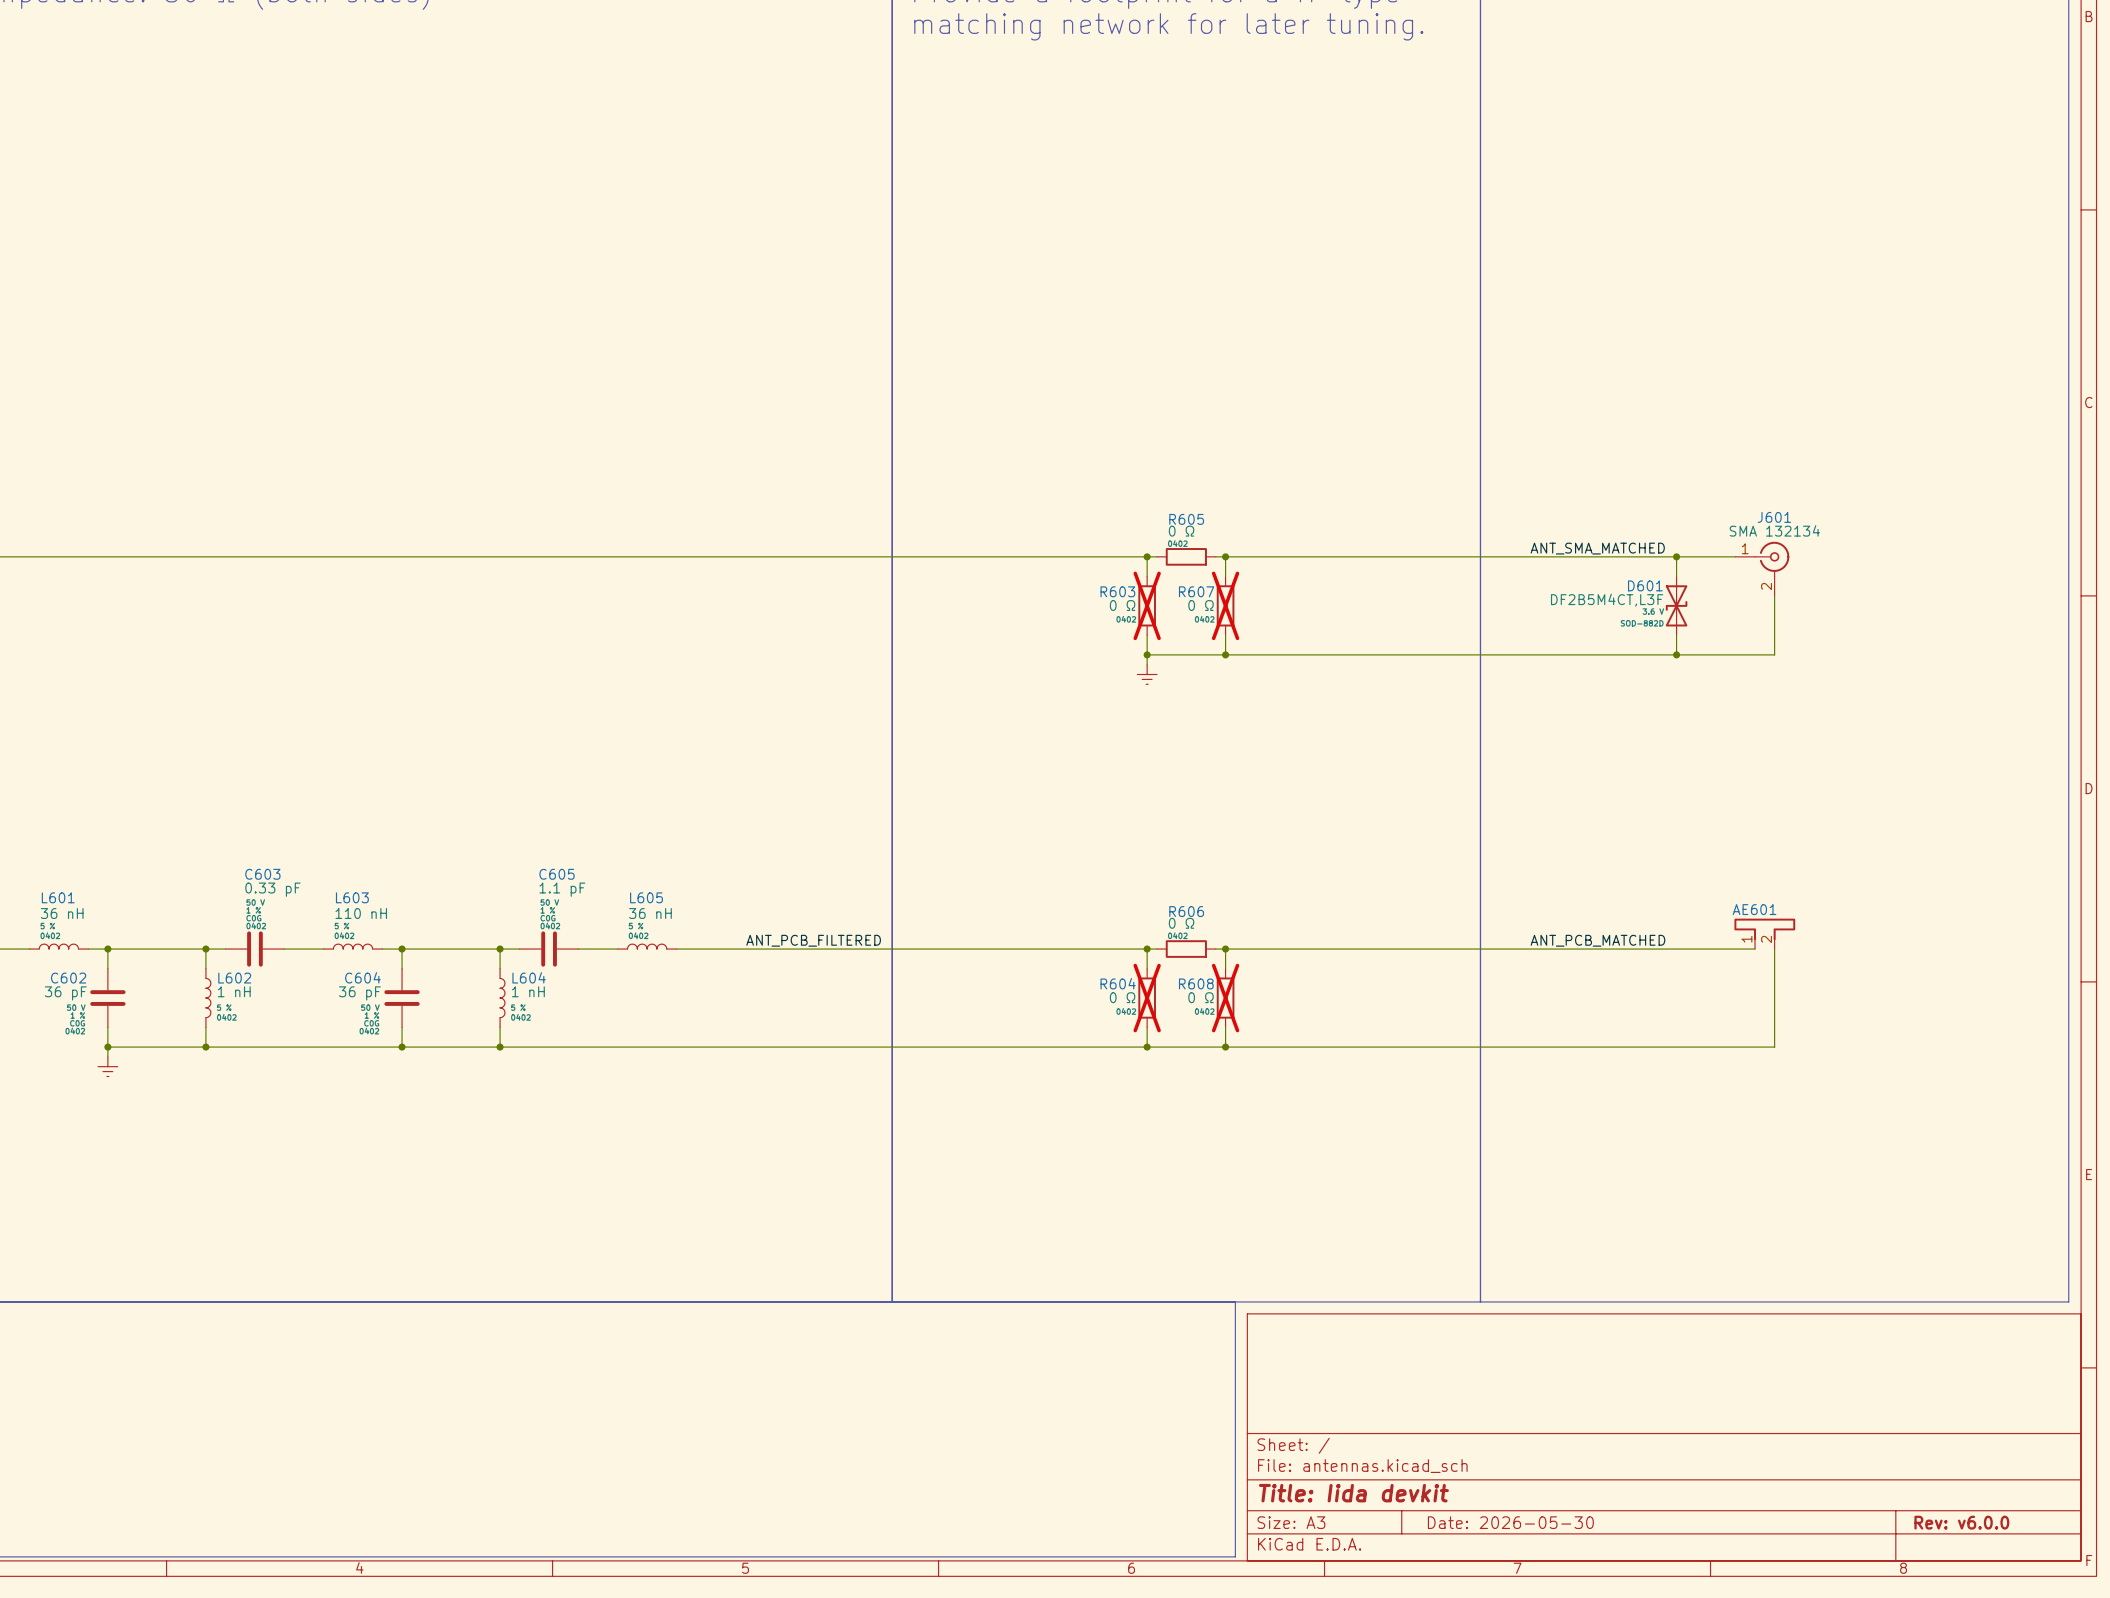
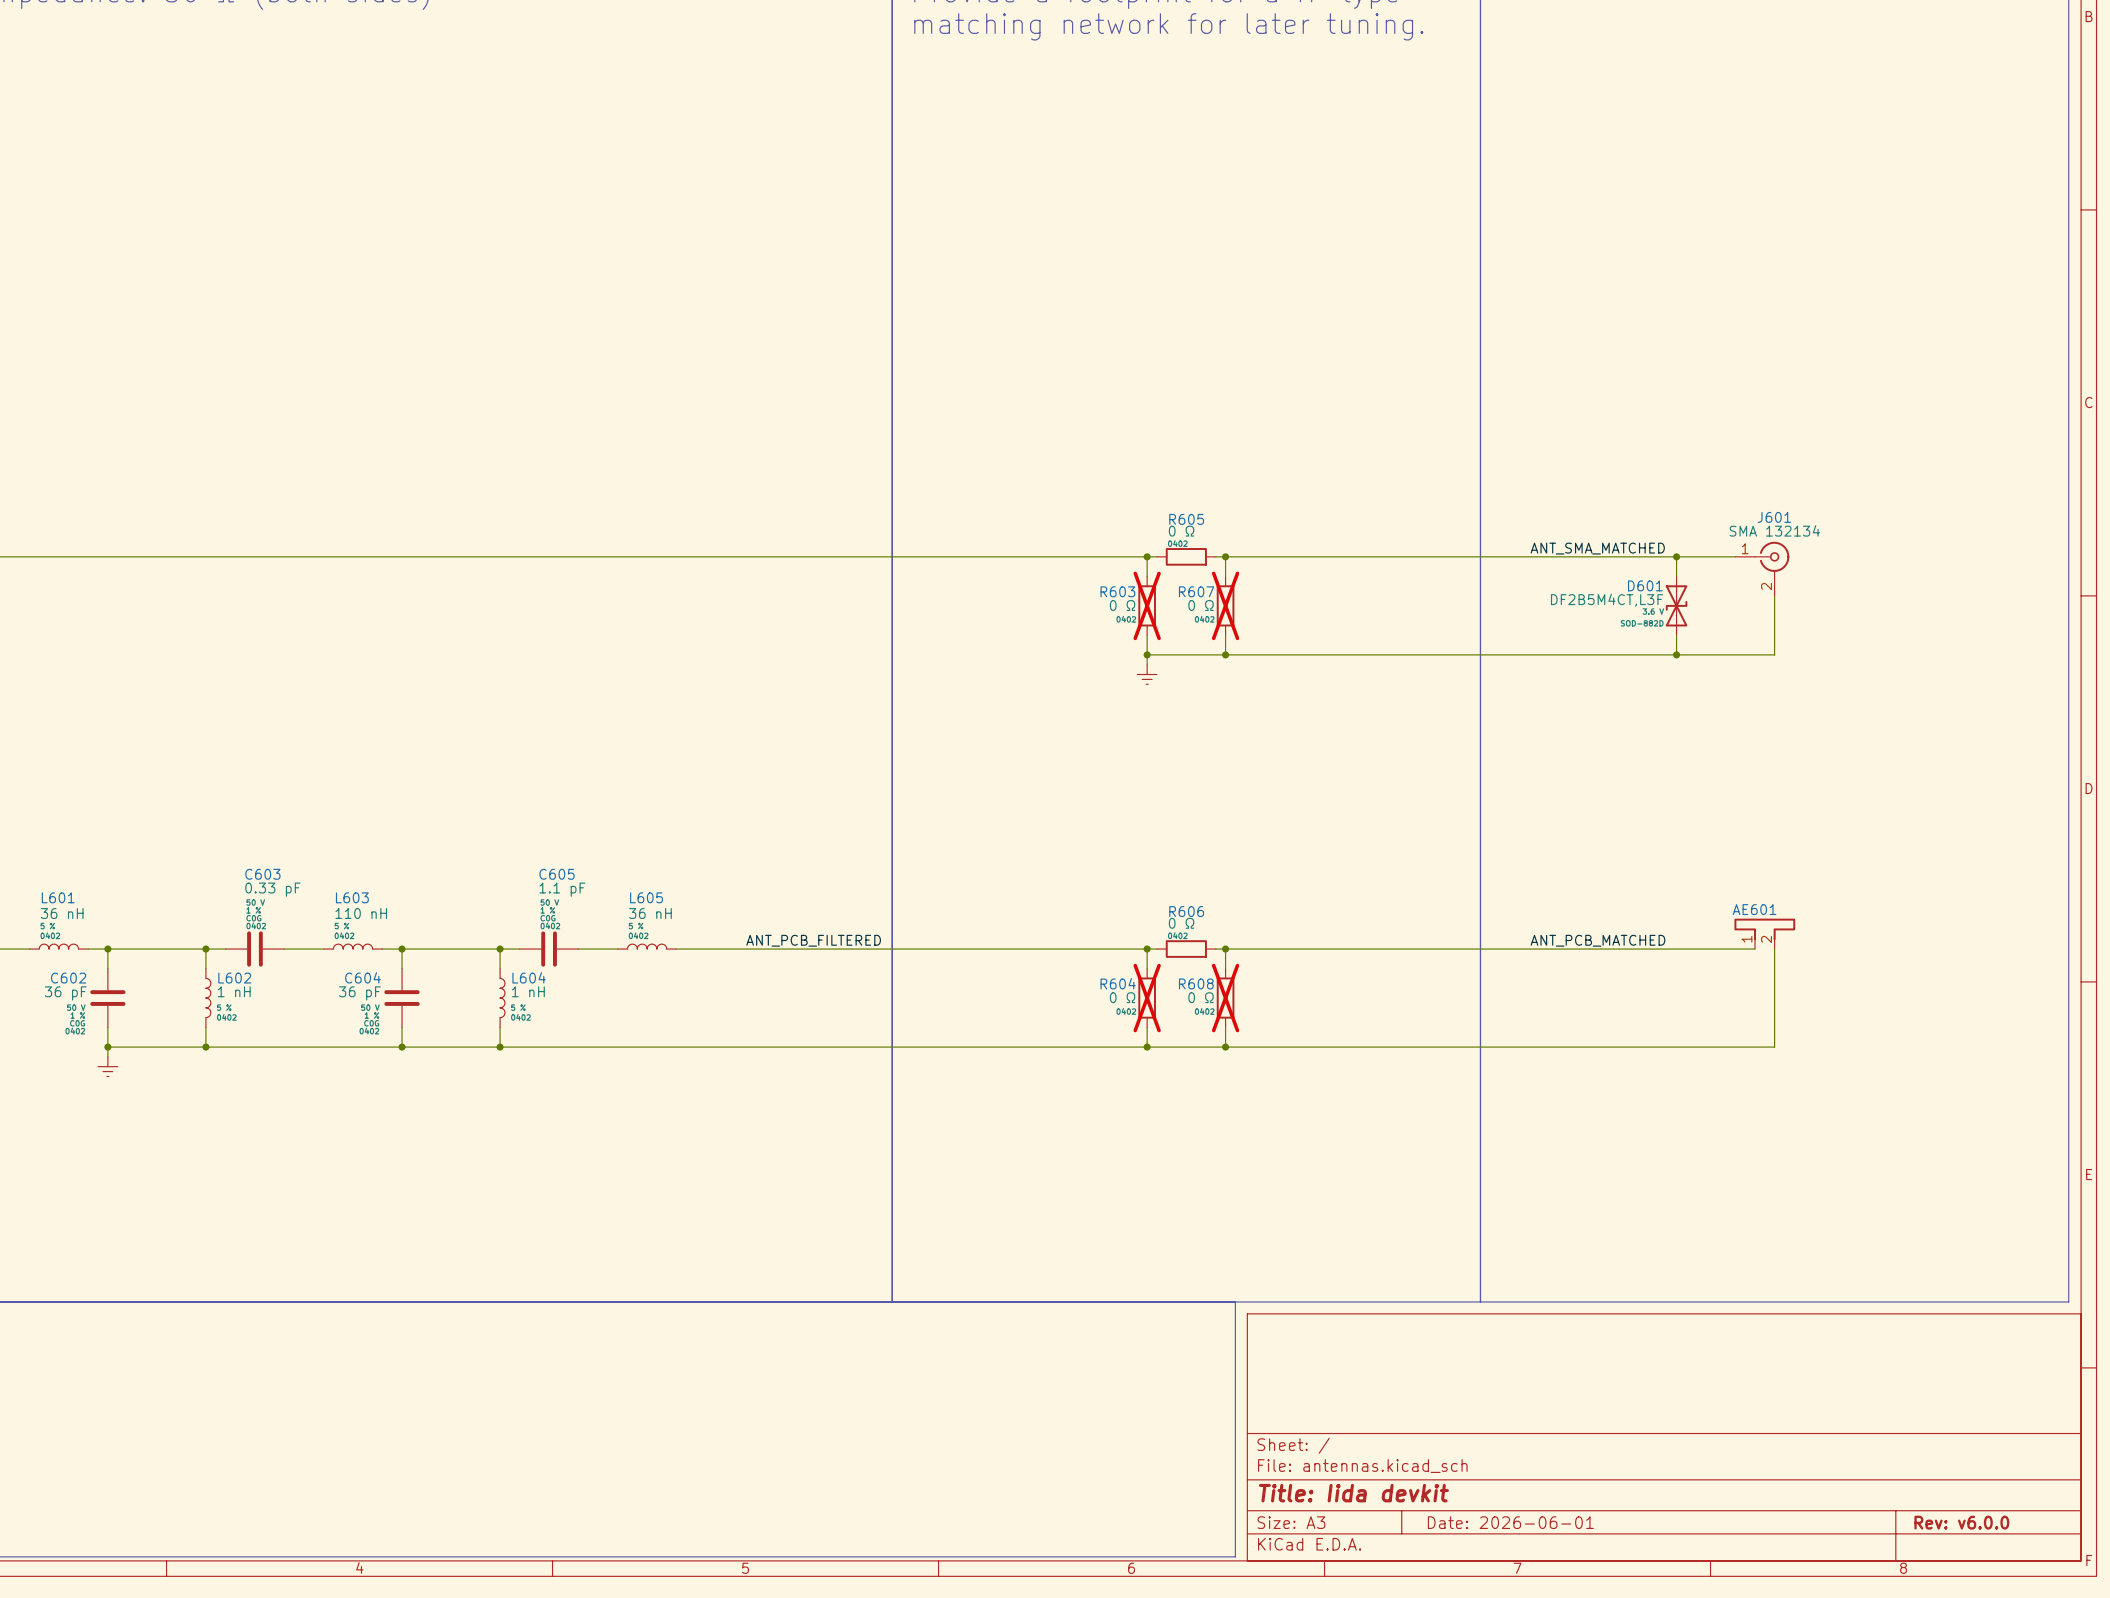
title block: Date: 2026-05-30 (1510, 1522) -> Date: 2026-06-01 (1510, 1522)

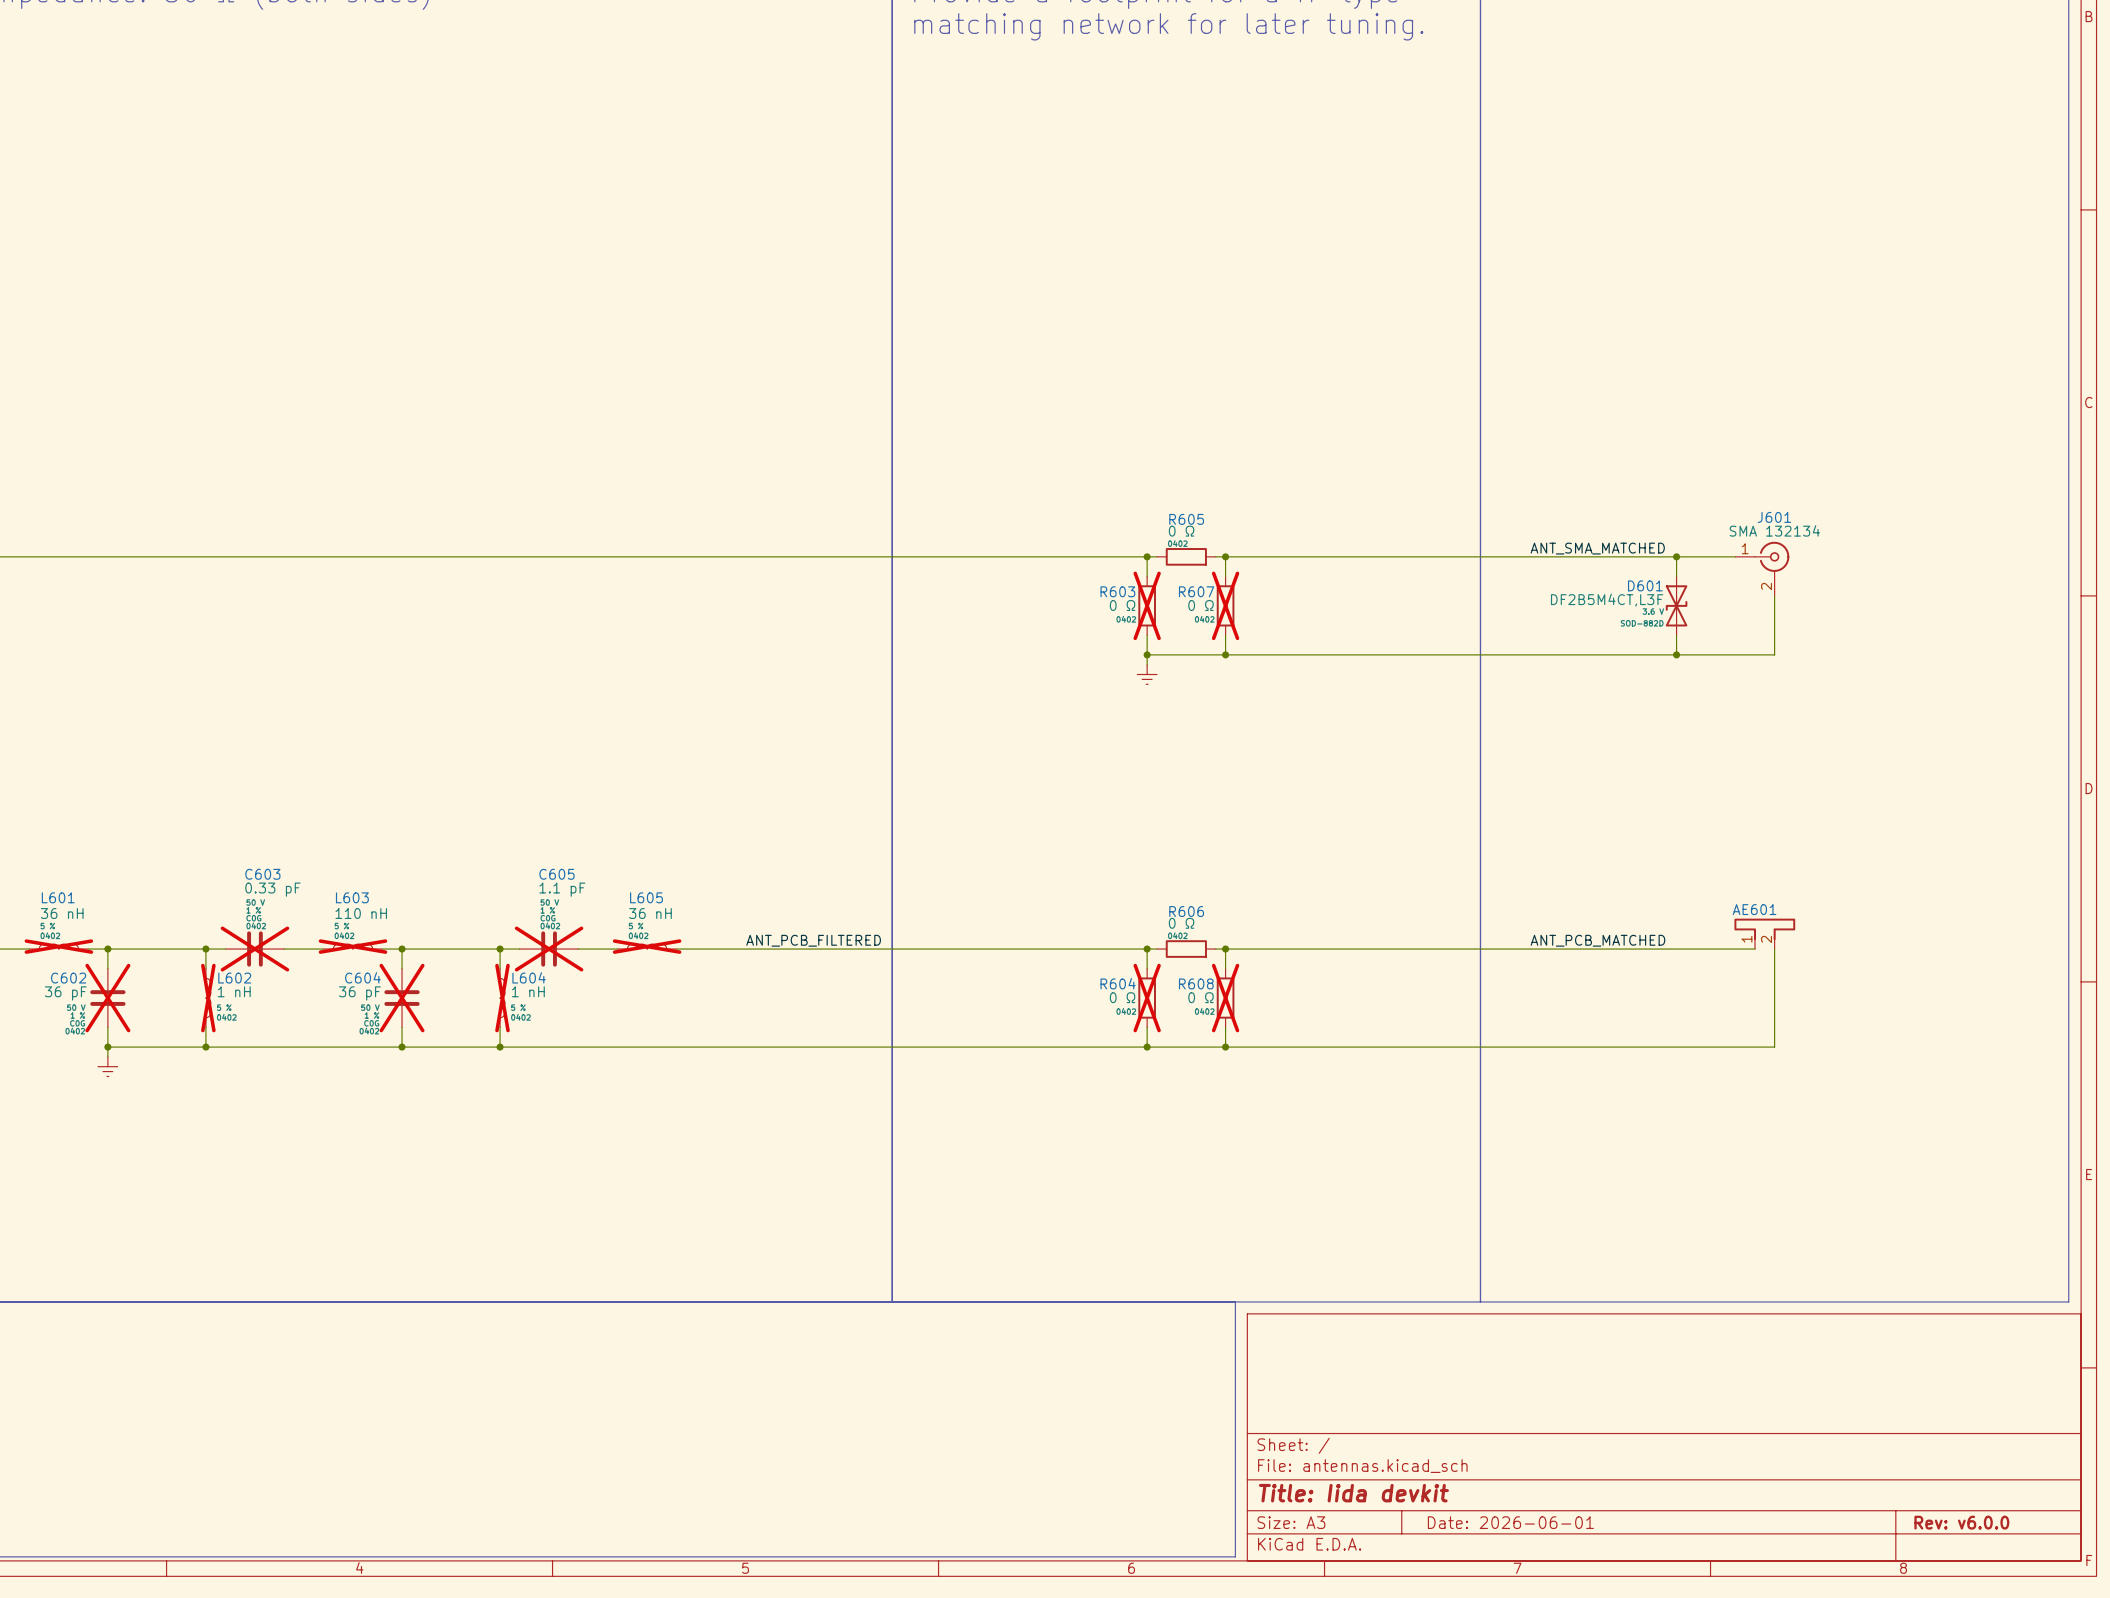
L601 do-not-place cross: none -> (58, 946)
L603 do-not-place cross: none -> (353, 946)
L605 do-not-place cross: none -> (647, 946)
C603 do-not-place cross: none -> (254, 949)
C605 do-not-place cross: none -> (549, 949)
C602 do-not-place cross: none -> (107, 998)
L602 do-not-place cross: none -> (208, 998)
C604 do-not-place cross: none -> (402, 998)
L604 do-not-place cross: none -> (502, 998)

